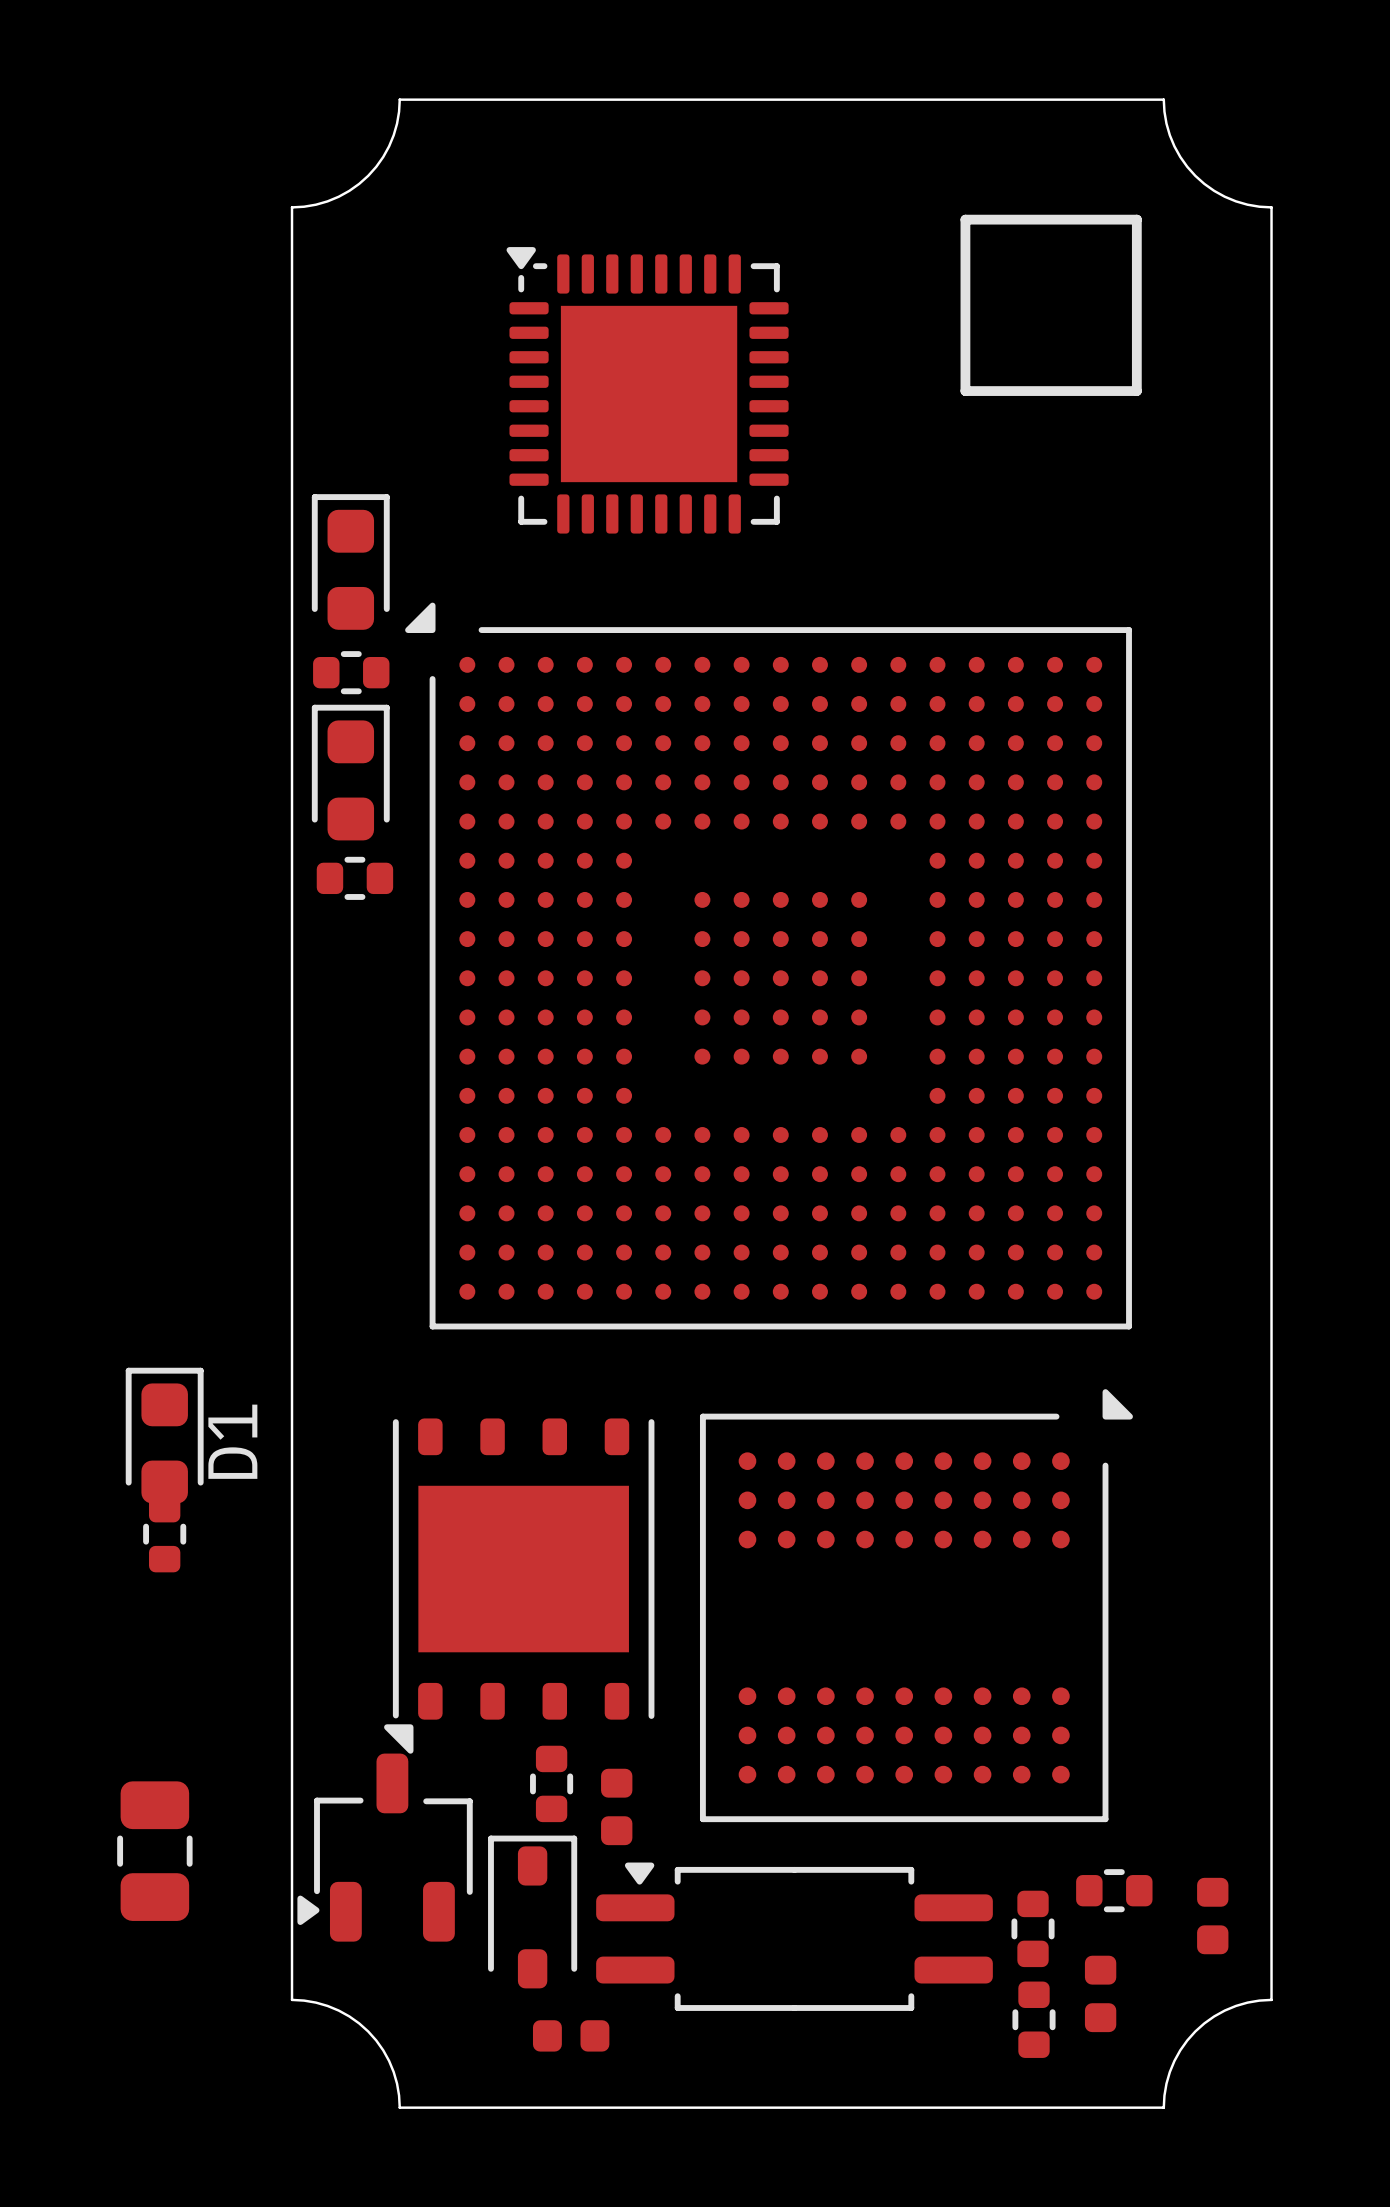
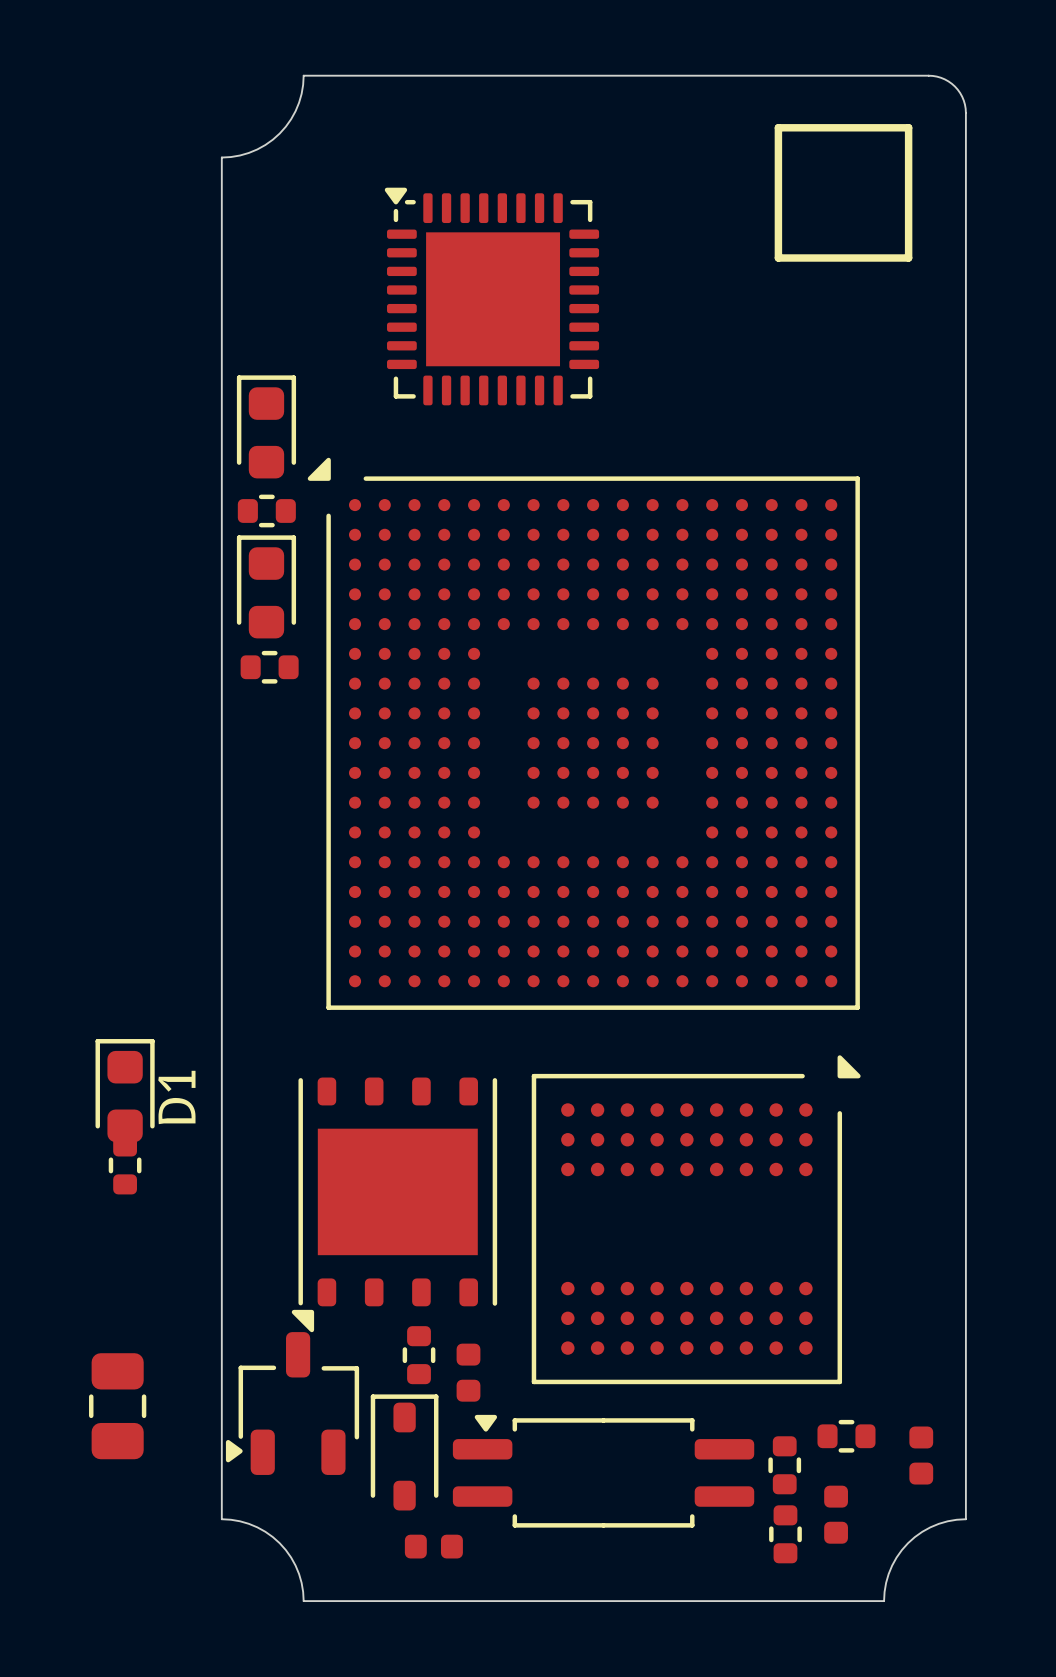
board edge: (1163, 99) (1166, 123) (1174, 146) (1195, 175) (1224, 196) (1247, 204) (1271, 207) -> (884, 75) (932, 75) (944, 79) (955, 86) (962, 96) (965, 108) (965, 157)
line: (965, 219) (1136, 219) (1136, 391) (965, 391) (965, 219) -> (778, 127) (908, 127) (908, 258) (778, 258) (778, 127)

